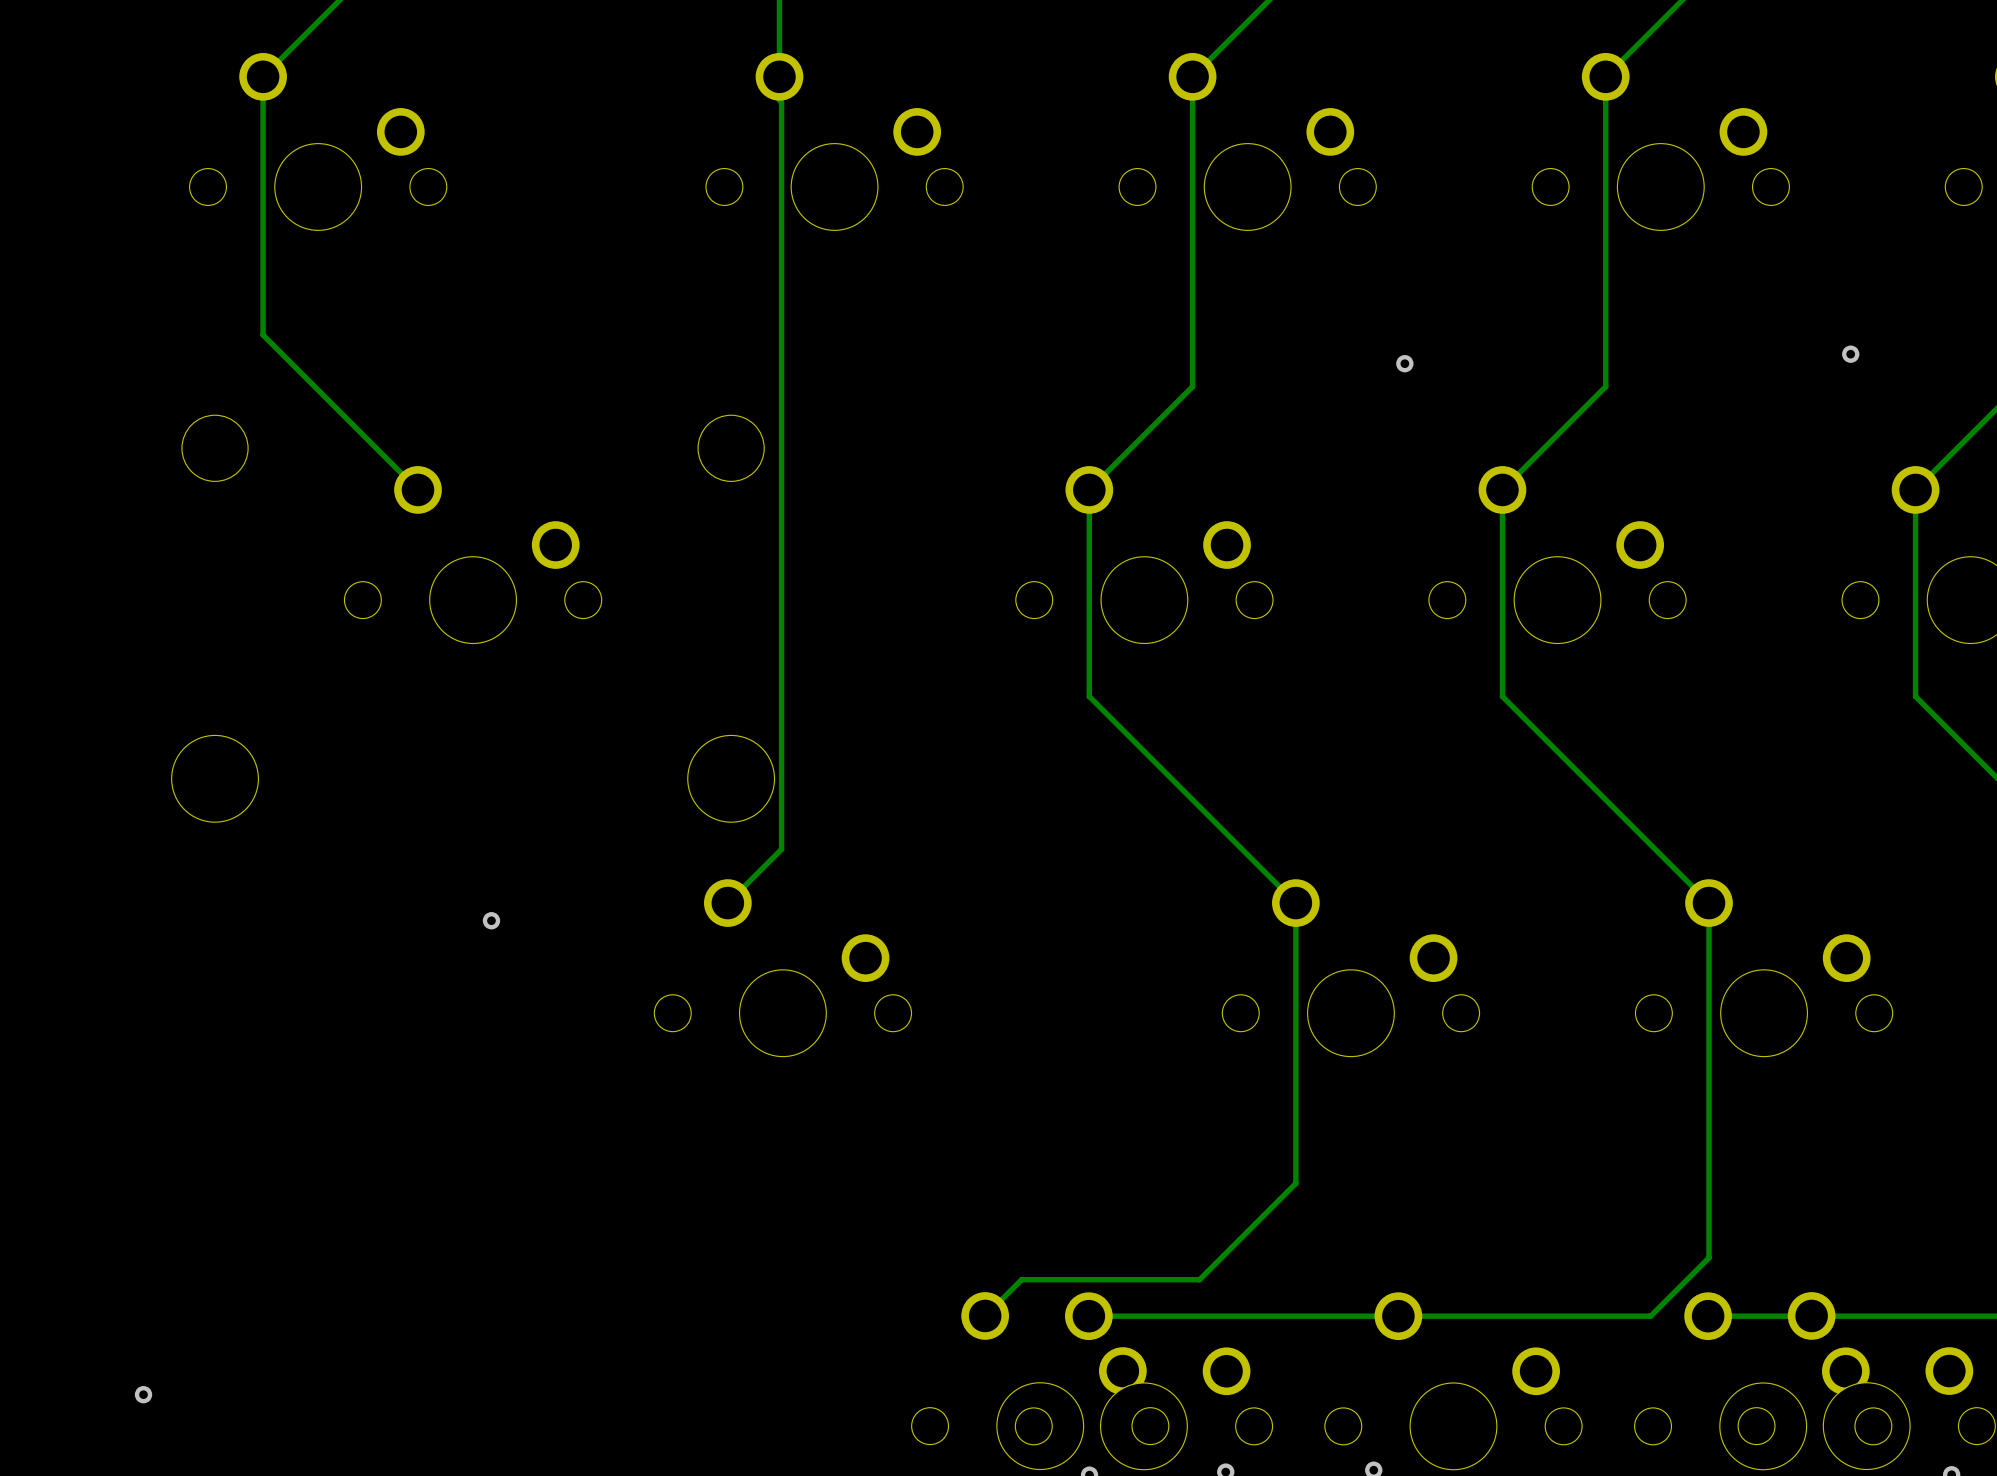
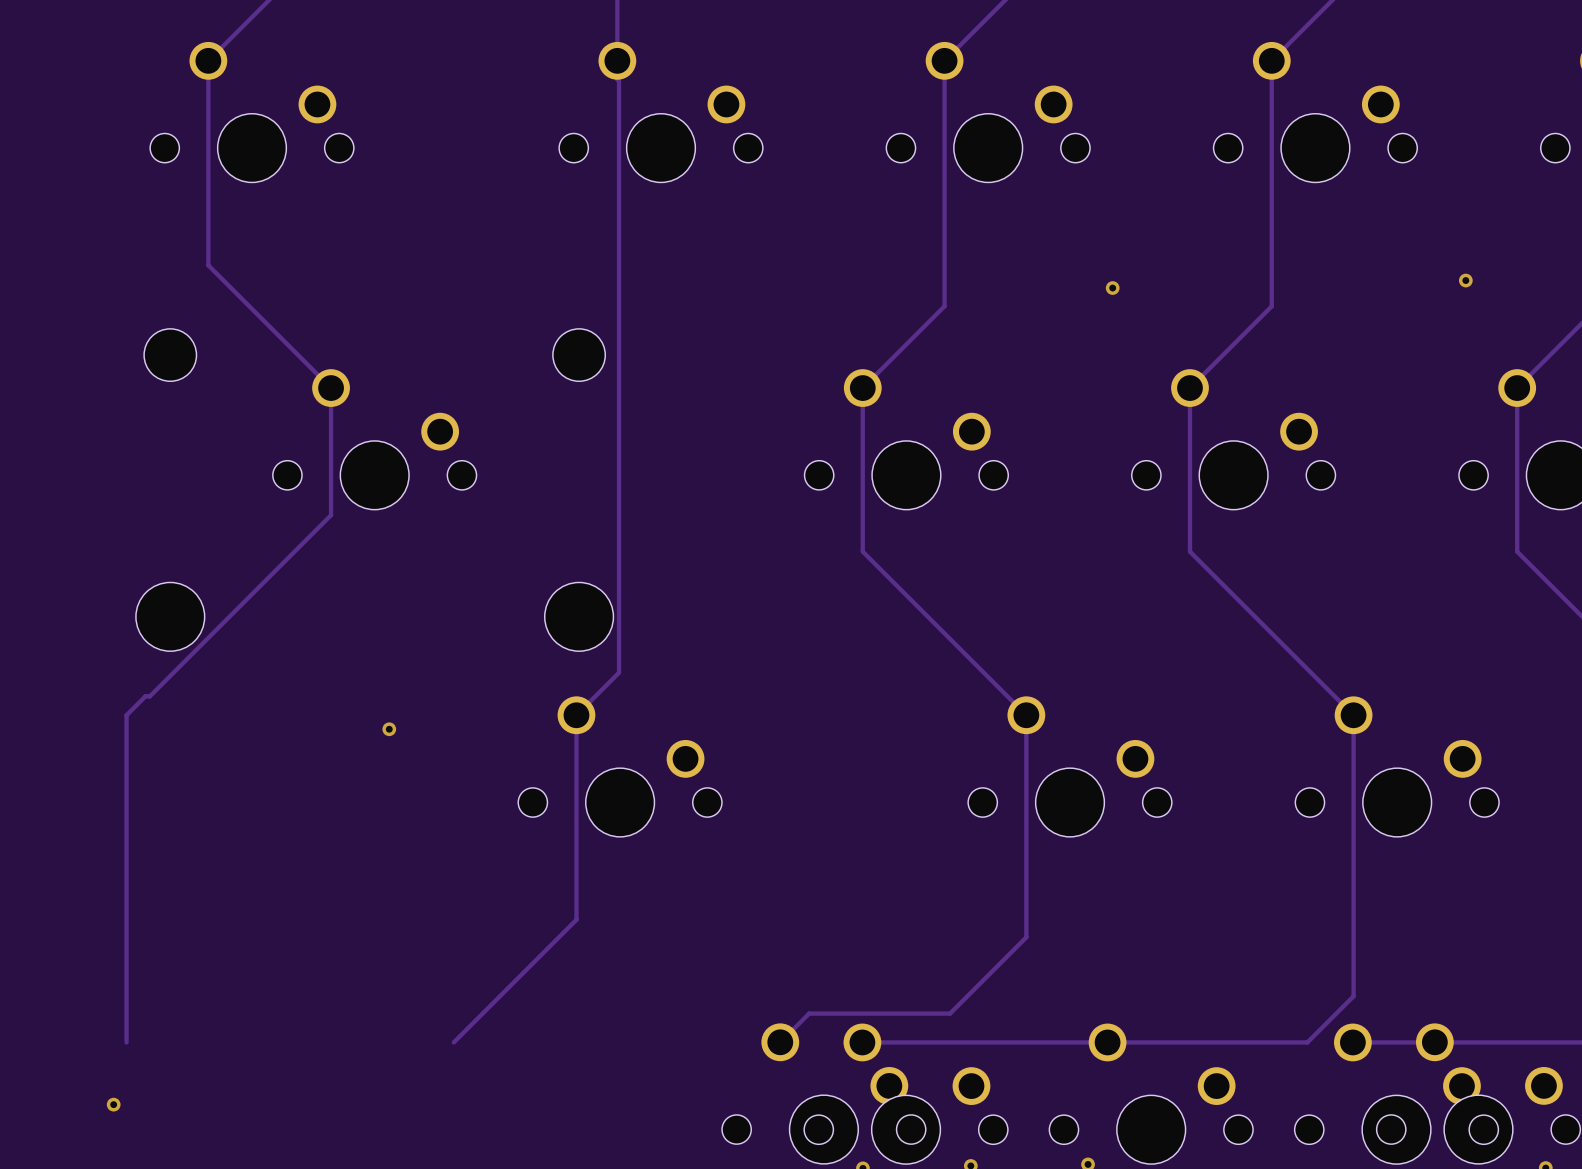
track: none -> (331, 388) (331, 515) (149, 696) (145, 696) (126, 715) (126, 1042)
track: none -> (576, 715) (576, 919) (453, 1042)

